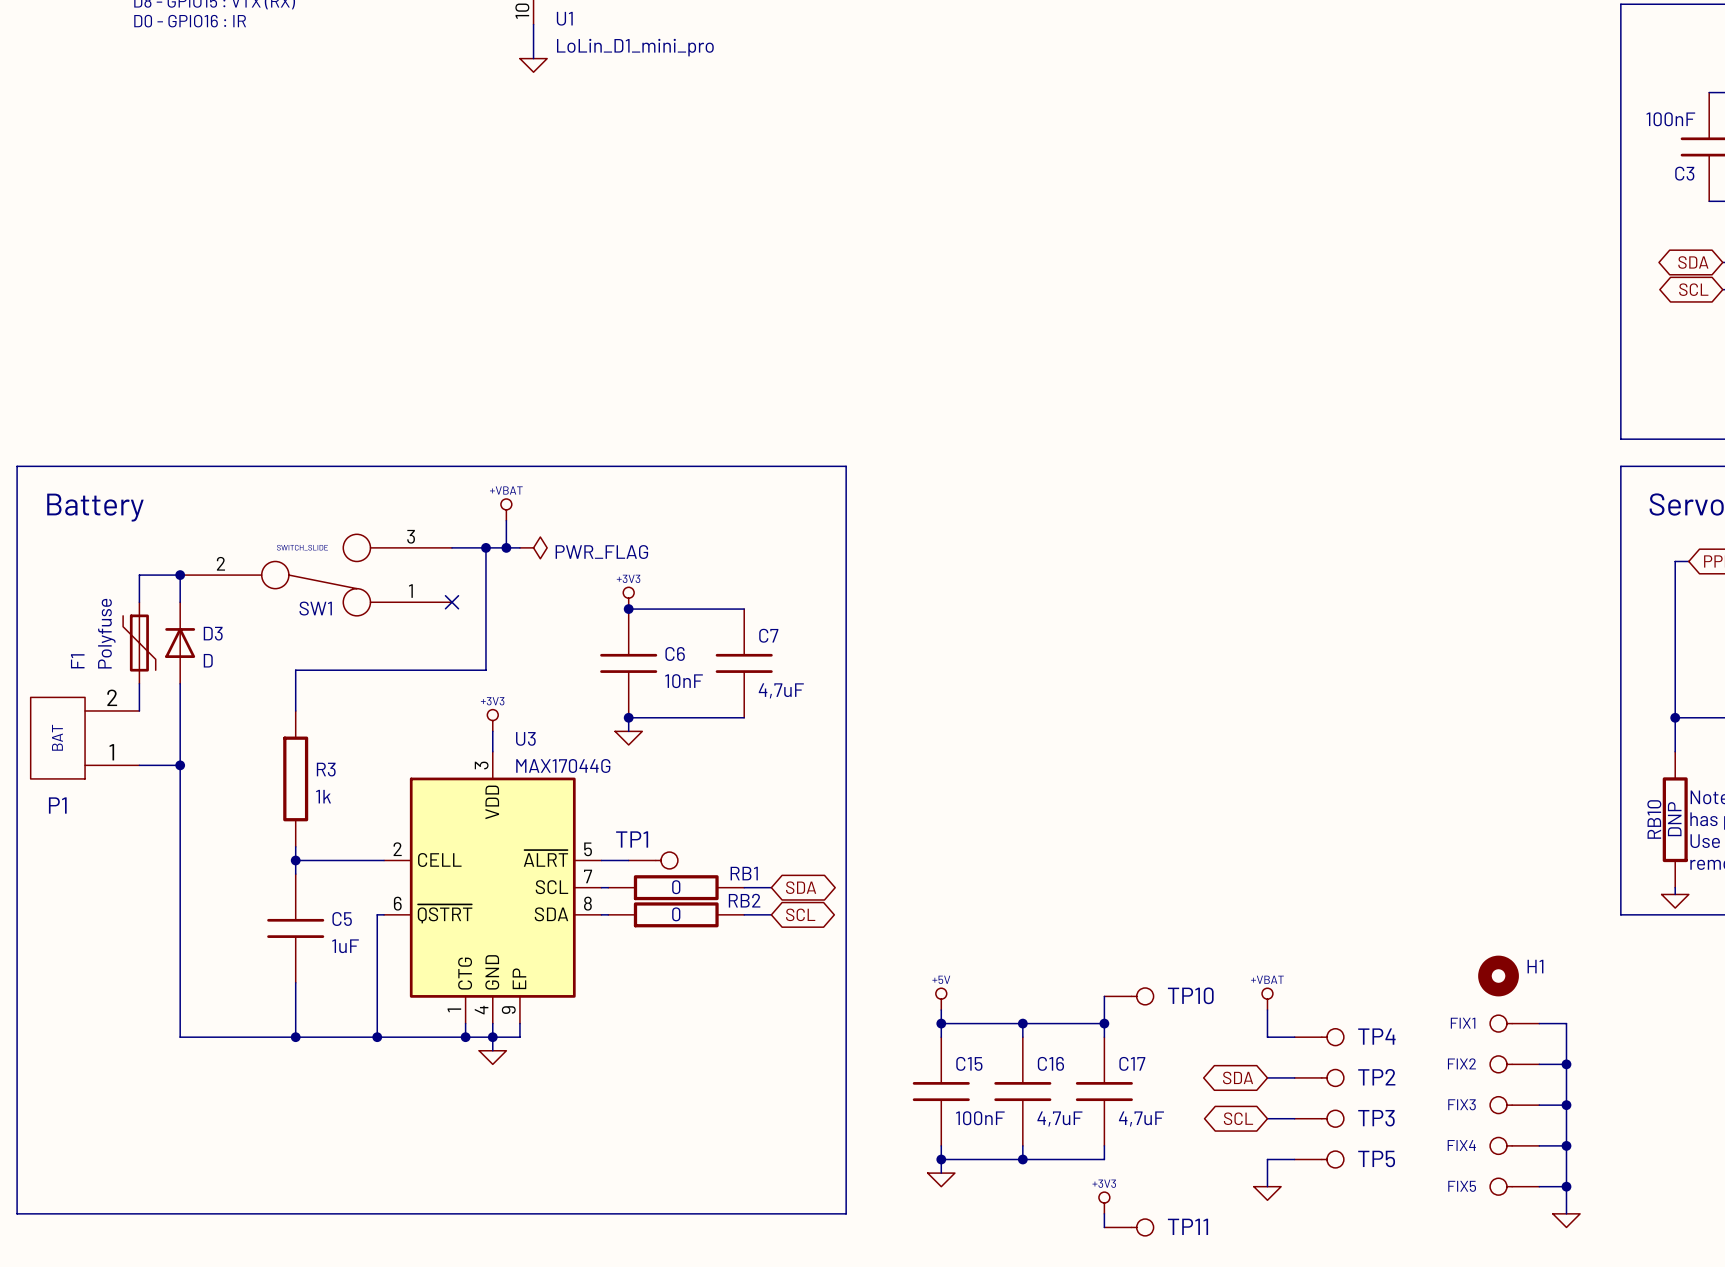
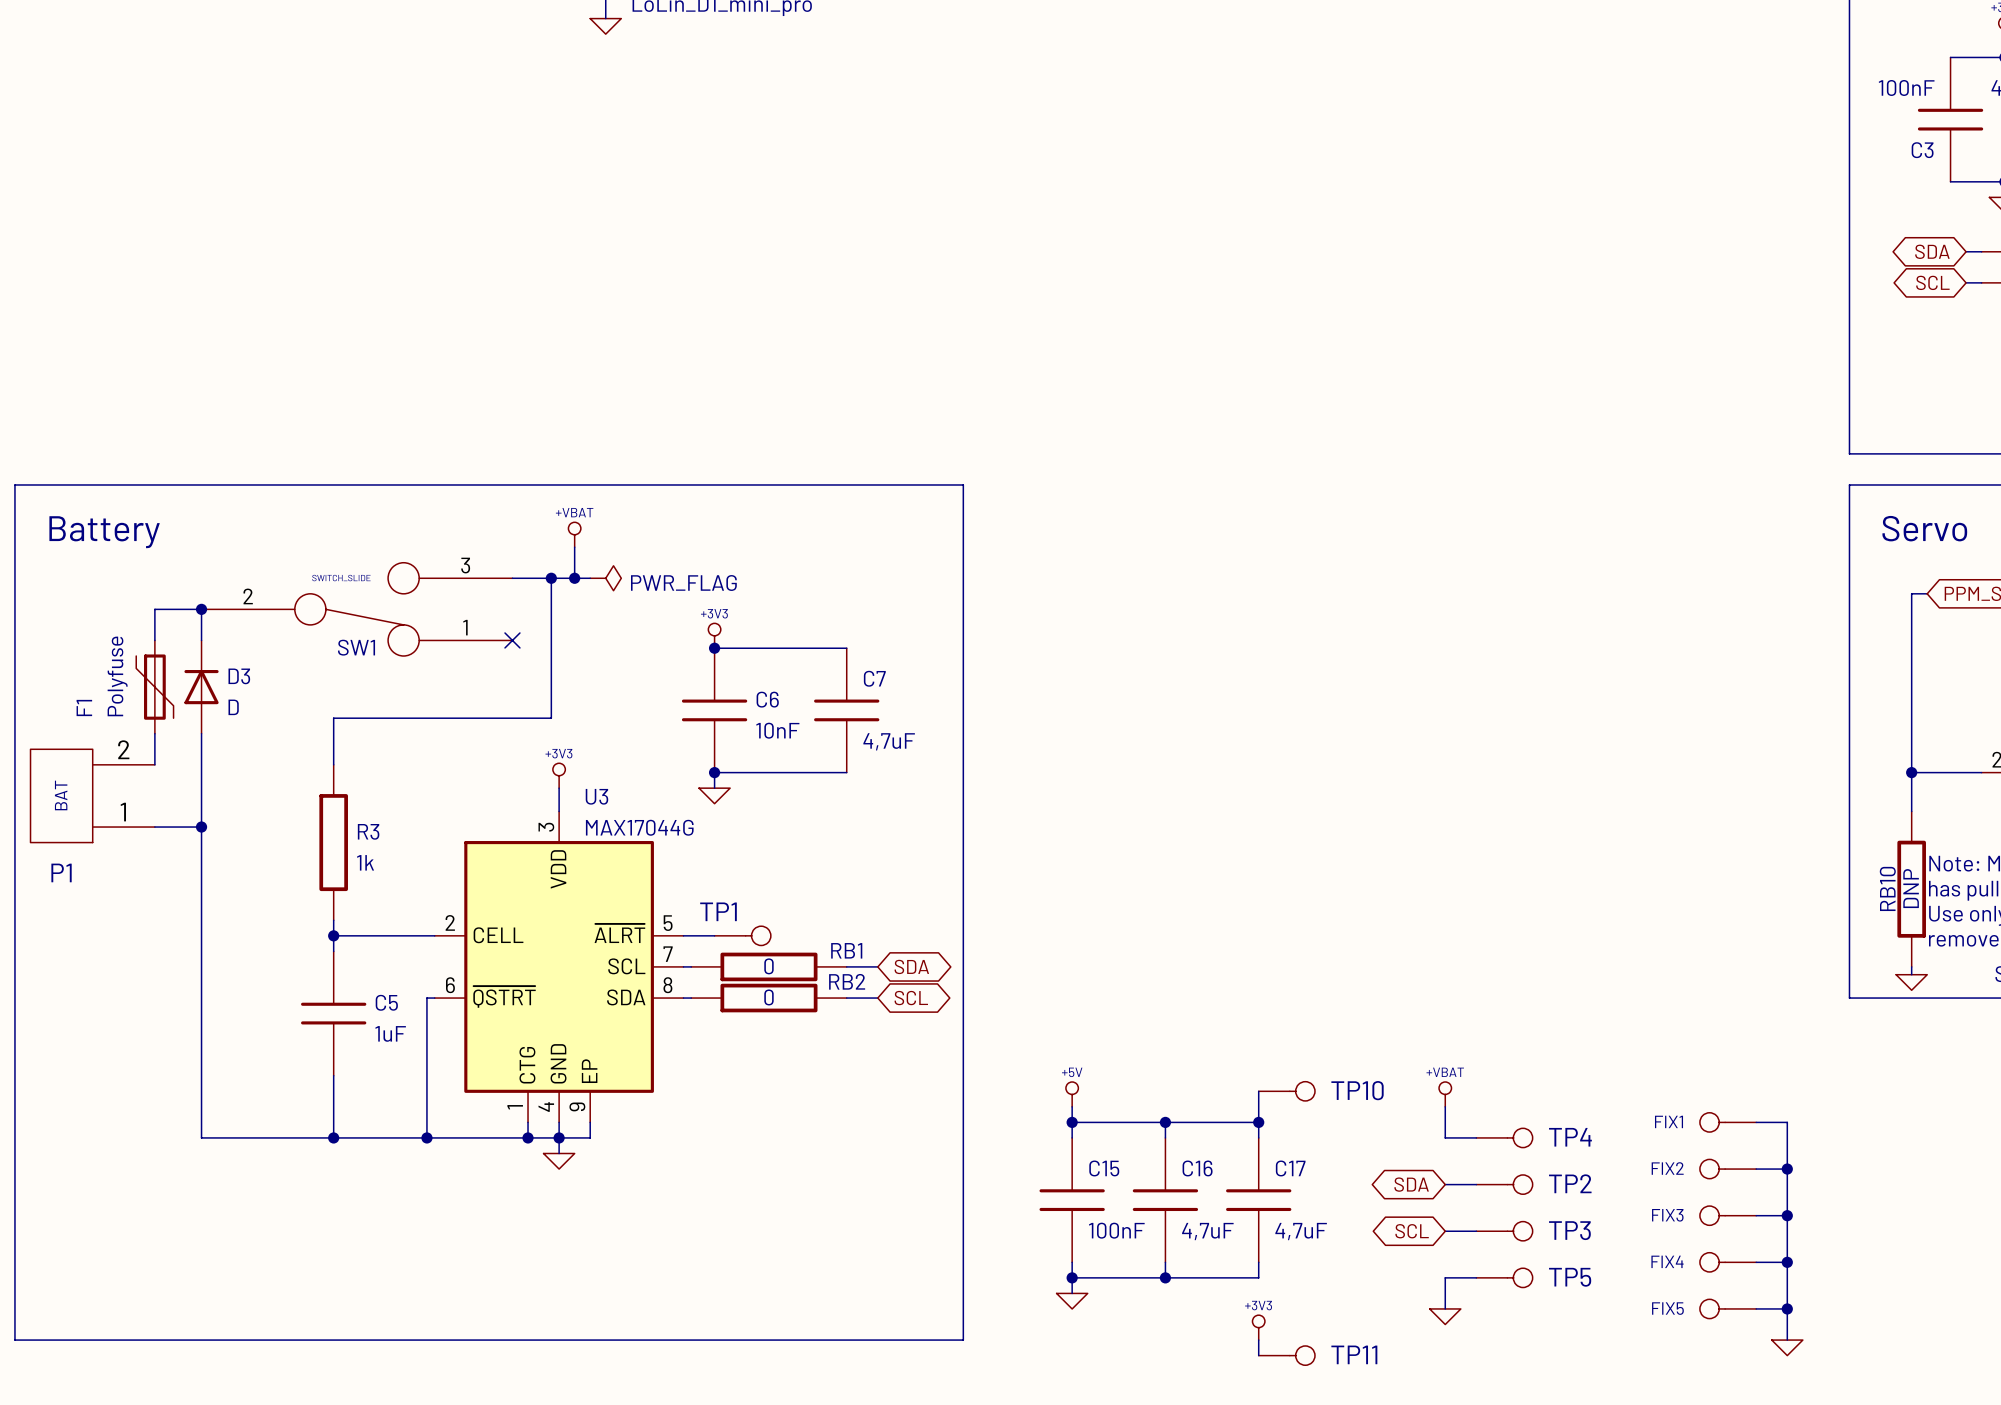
H1: (1498, 976) -> none

